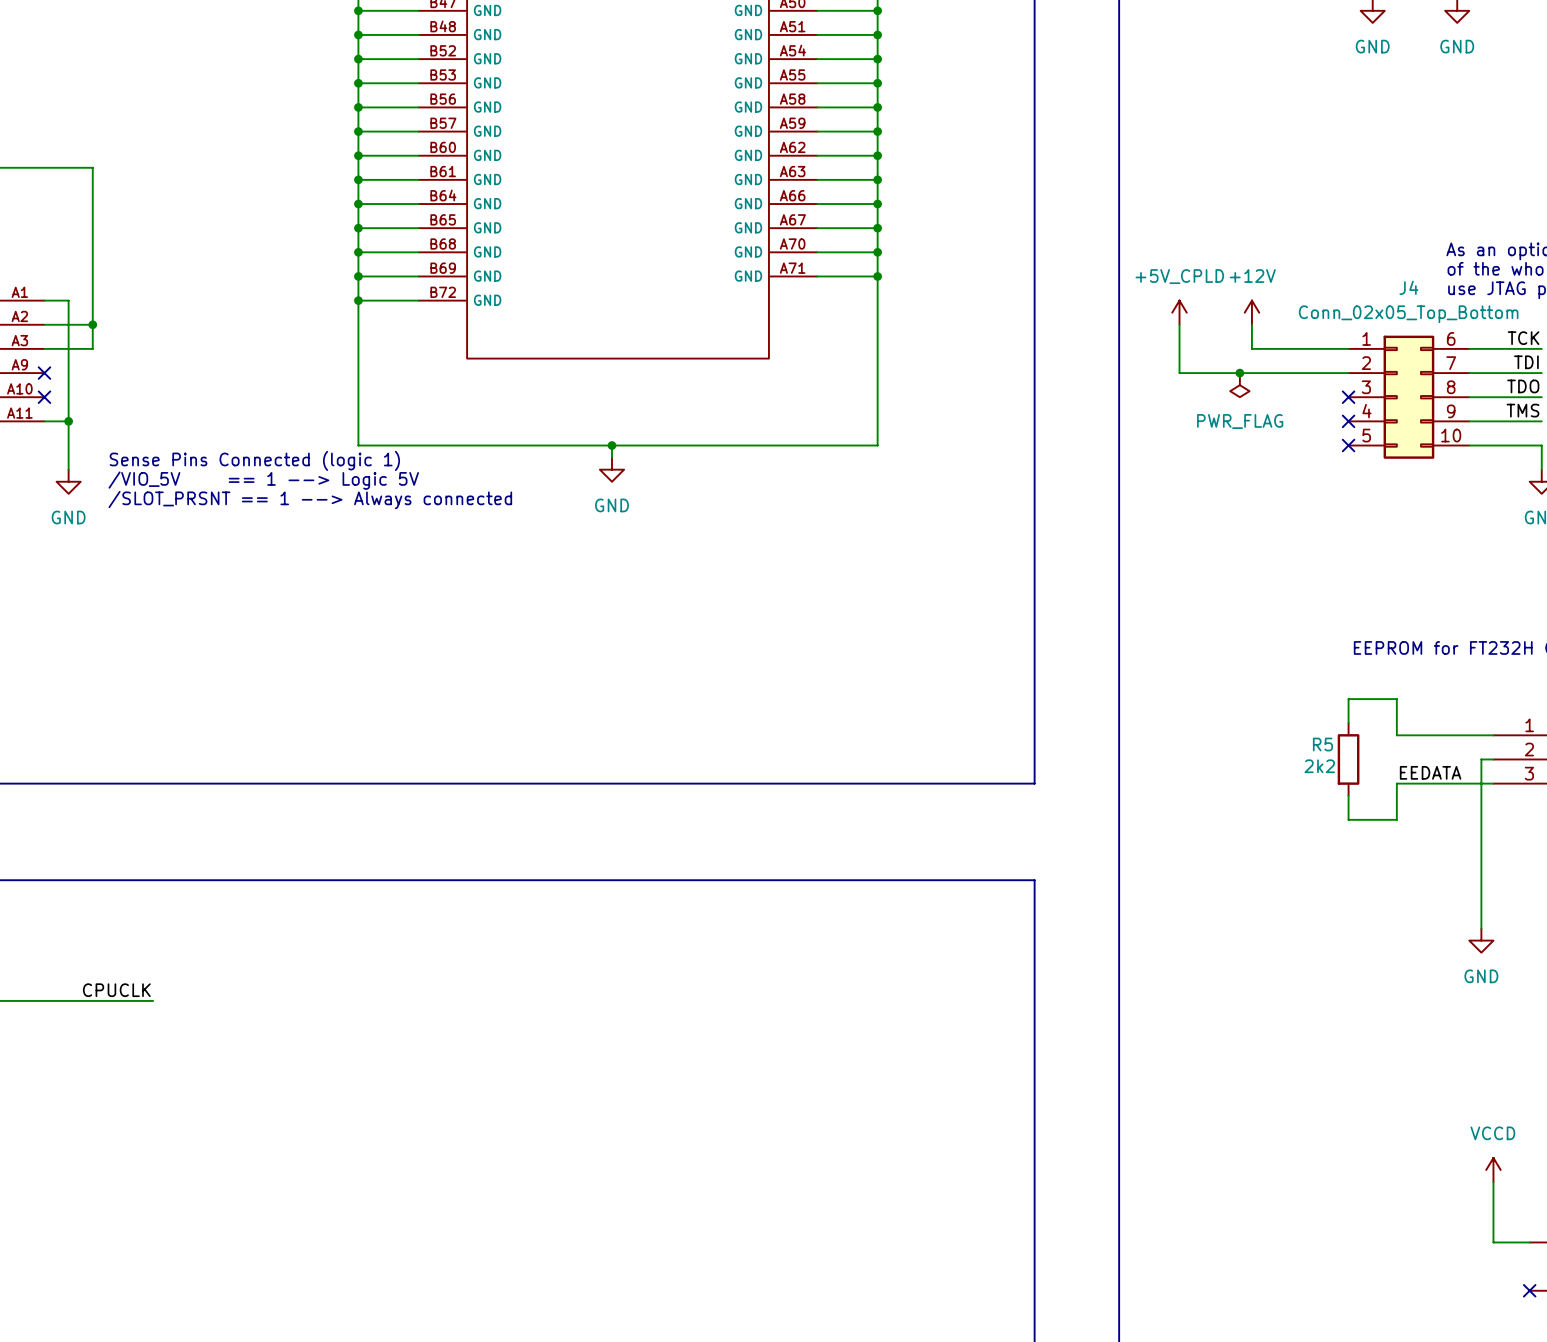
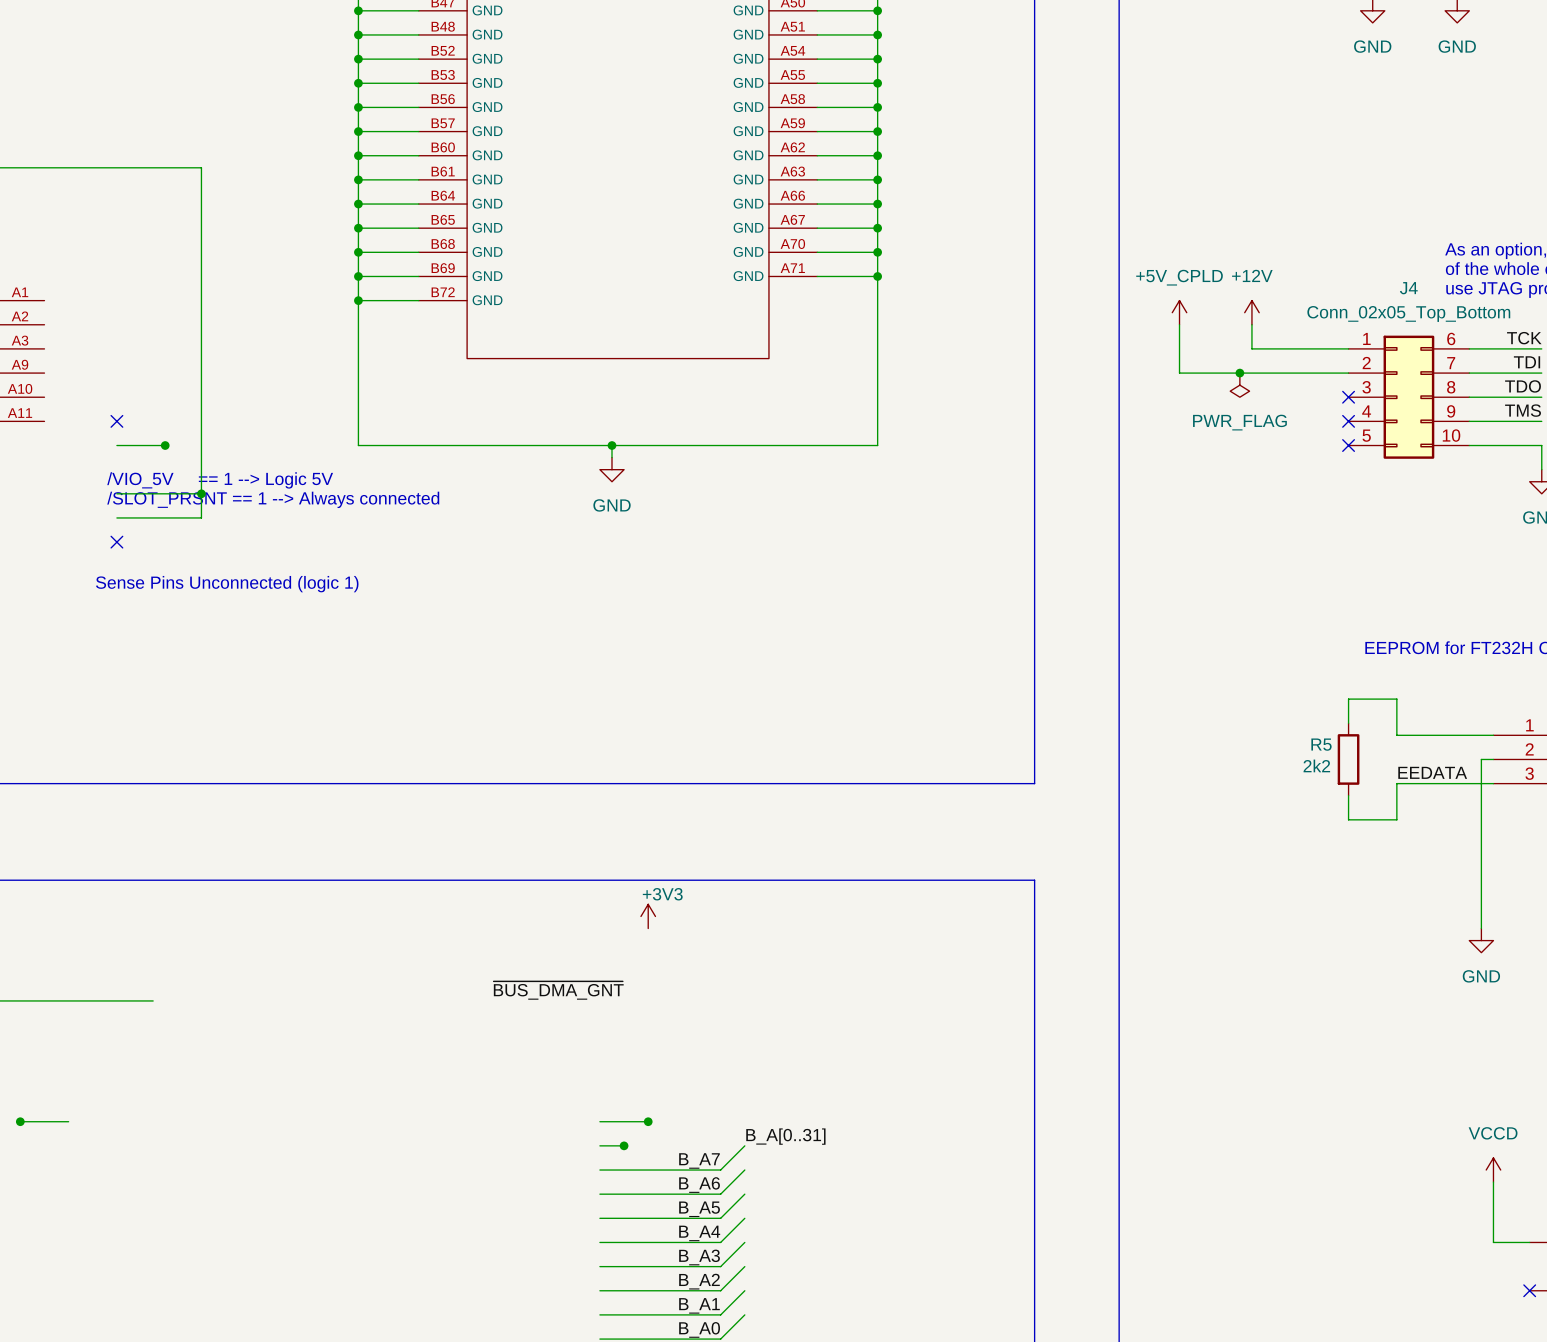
wire: (92, 167) (92, 348) (44, 348) -> (92, 167) (201, 167) (201, 517) (116, 517)
wire: (44, 300) (68, 300) (68, 469) -> none
wire: (44, 324) (92, 324) -> (116, 445) (165, 445)
junction: (92, 324) -> none
no-connect mark: (44, 373) -> none
no-connect mark: (44, 397) -> none
wire: (44, 421) (68, 421) -> none
junction: (68, 421) -> none
no-connect mark: none -> (116, 421)
junction: none -> (165, 445)
text: Sense Pins Connected (logic 1) (254, 460) -> none
power symbol: GND (68, 481) -> none
wire: none -> (116, 493) (201, 493)
junction: none -> (201, 493)
no-connect mark: none -> (116, 542)
text: none -> Sense Pins Unconnected (logic 1) (227, 584)
power symbol: none -> +3V3 (648, 916)
label: none -> ~{BUS_DMA_GNT} (558, 990)
label: CPUCLK (116, 990) -> none
wire: none -> (20, 1121) (68, 1121)
junction: none -> (20, 1121)
wire: none -> (599, 1121) (648, 1121)
junction: none -> (648, 1121)
label: none -> B_A[0..31] (785, 1136)
wire: none -> (599, 1145) (624, 1145)
junction: none -> (624, 1145)
wire: none -> (744, 1145) (720, 1170) (599, 1170)
label: none -> B_A7 (699, 1160)
wire: none -> (744, 1170) (720, 1194) (599, 1194)
label: none -> B_A6 (699, 1185)
wire: none -> (744, 1194) (720, 1218) (599, 1218)
label: none -> B_A5 (699, 1209)
wire: none -> (744, 1218) (720, 1242) (599, 1242)
label: none -> B_A4 (699, 1233)
wire: none -> (744, 1242) (720, 1266) (599, 1266)
label: none -> B_A3 (699, 1257)
wire: none -> (744, 1266) (720, 1290) (599, 1290)
label: none -> B_A2 (699, 1281)
wire: none -> (744, 1290) (720, 1314) (599, 1314)
label: none -> B_A1 (699, 1305)
wire: none -> (744, 1314) (720, 1339) (599, 1339)
label: none -> B_A0 (699, 1329)

